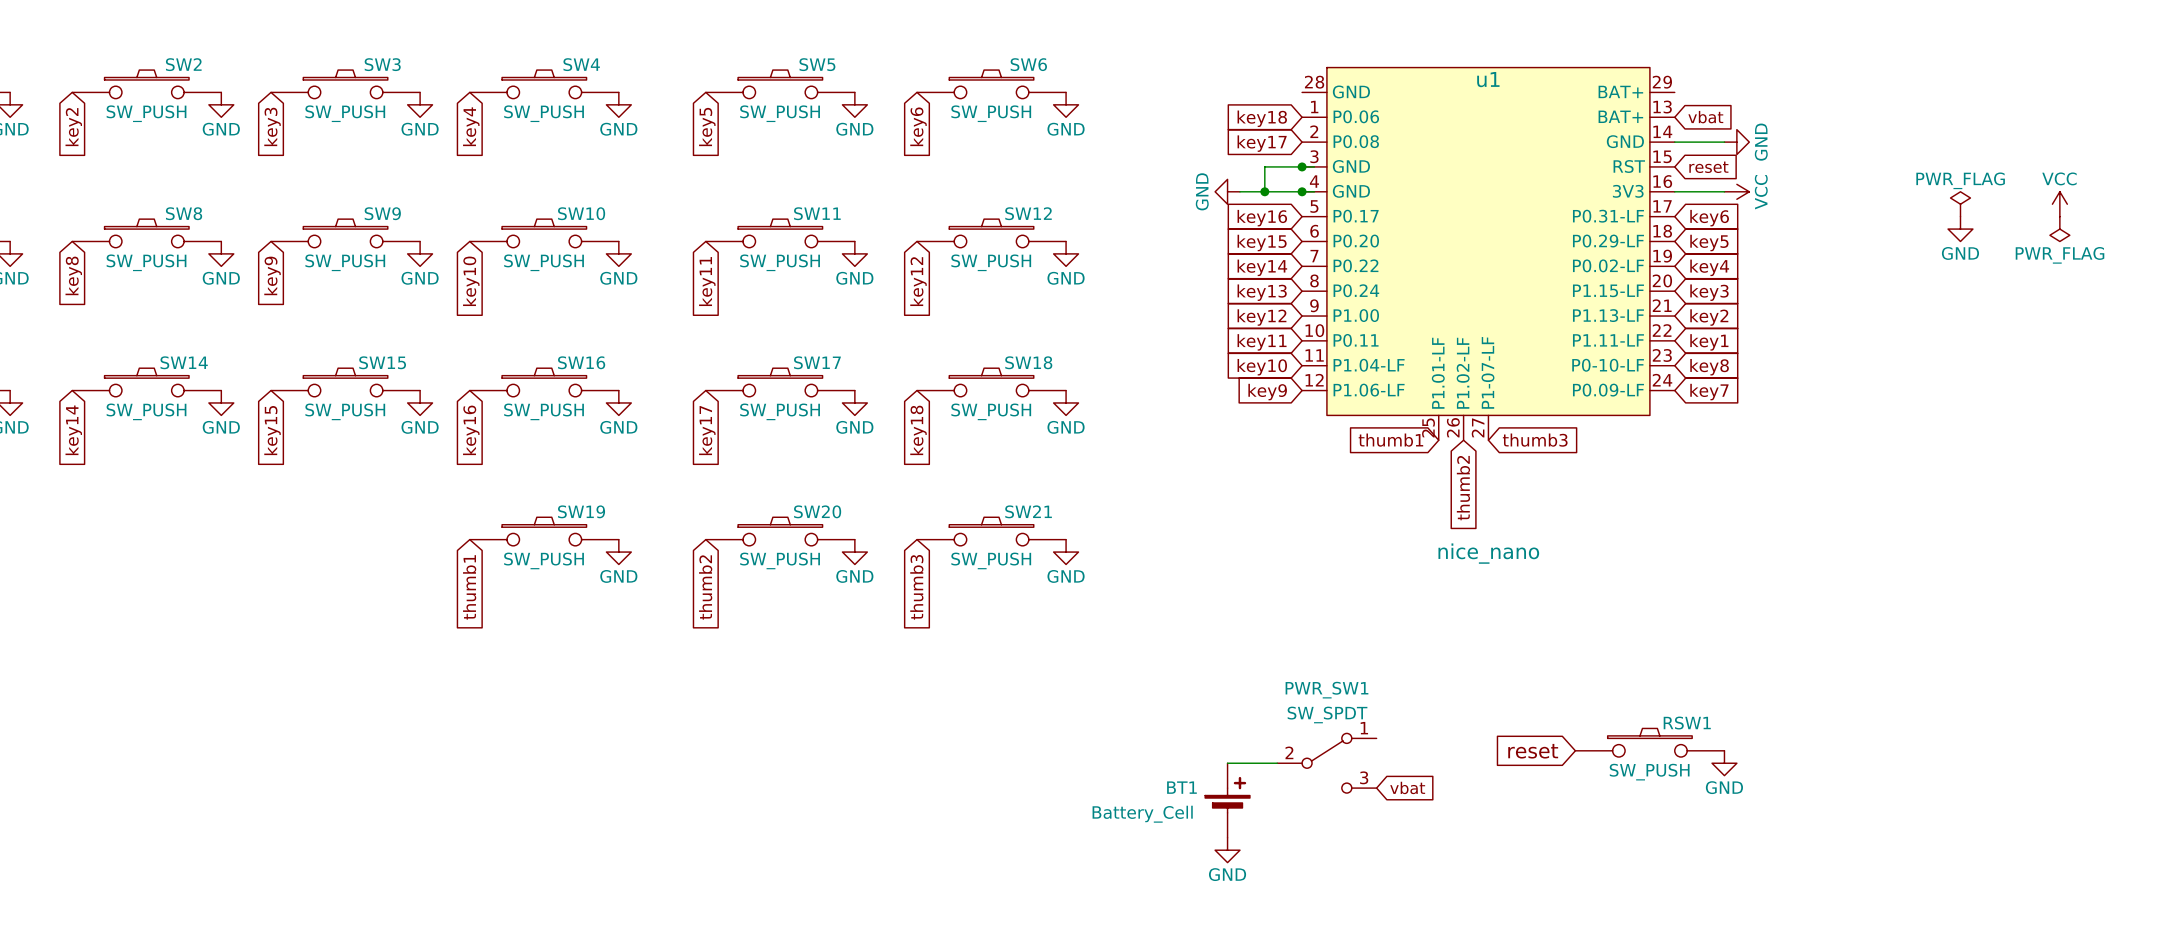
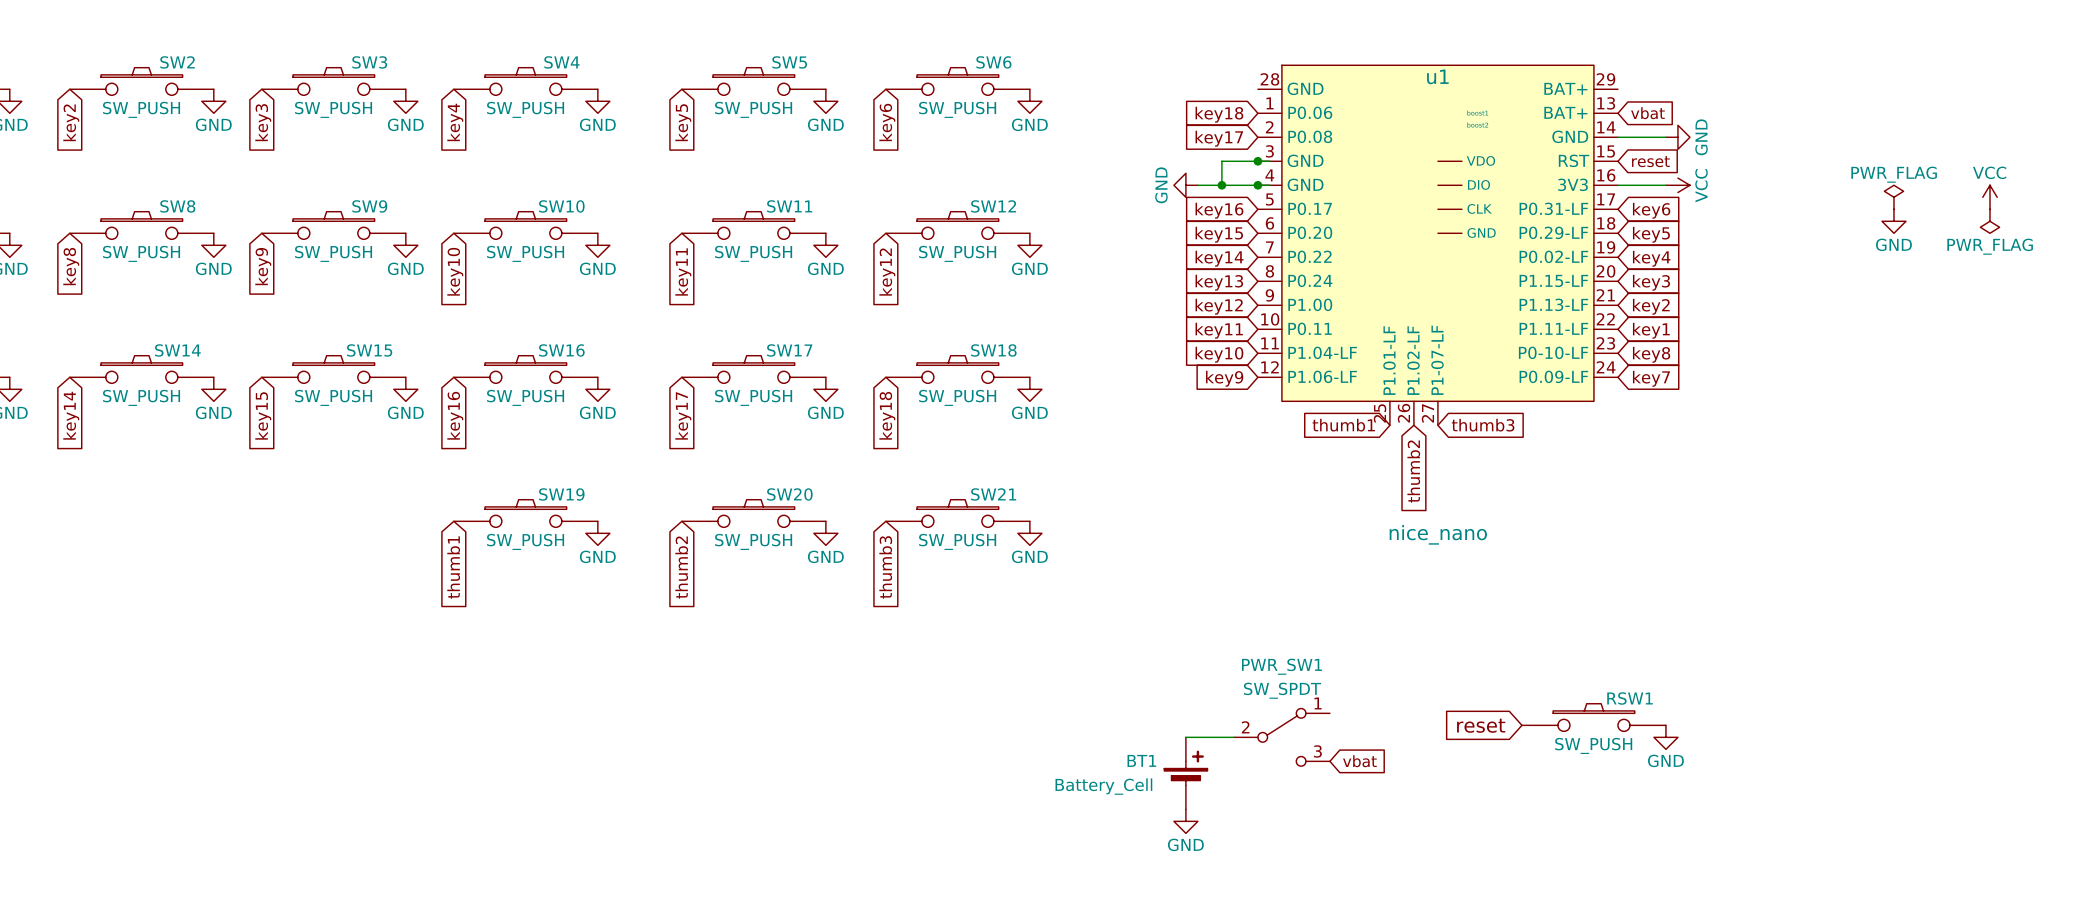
u1 symbol: [1302, 67, 1675, 441] -> [1257, 65, 1618, 426]

